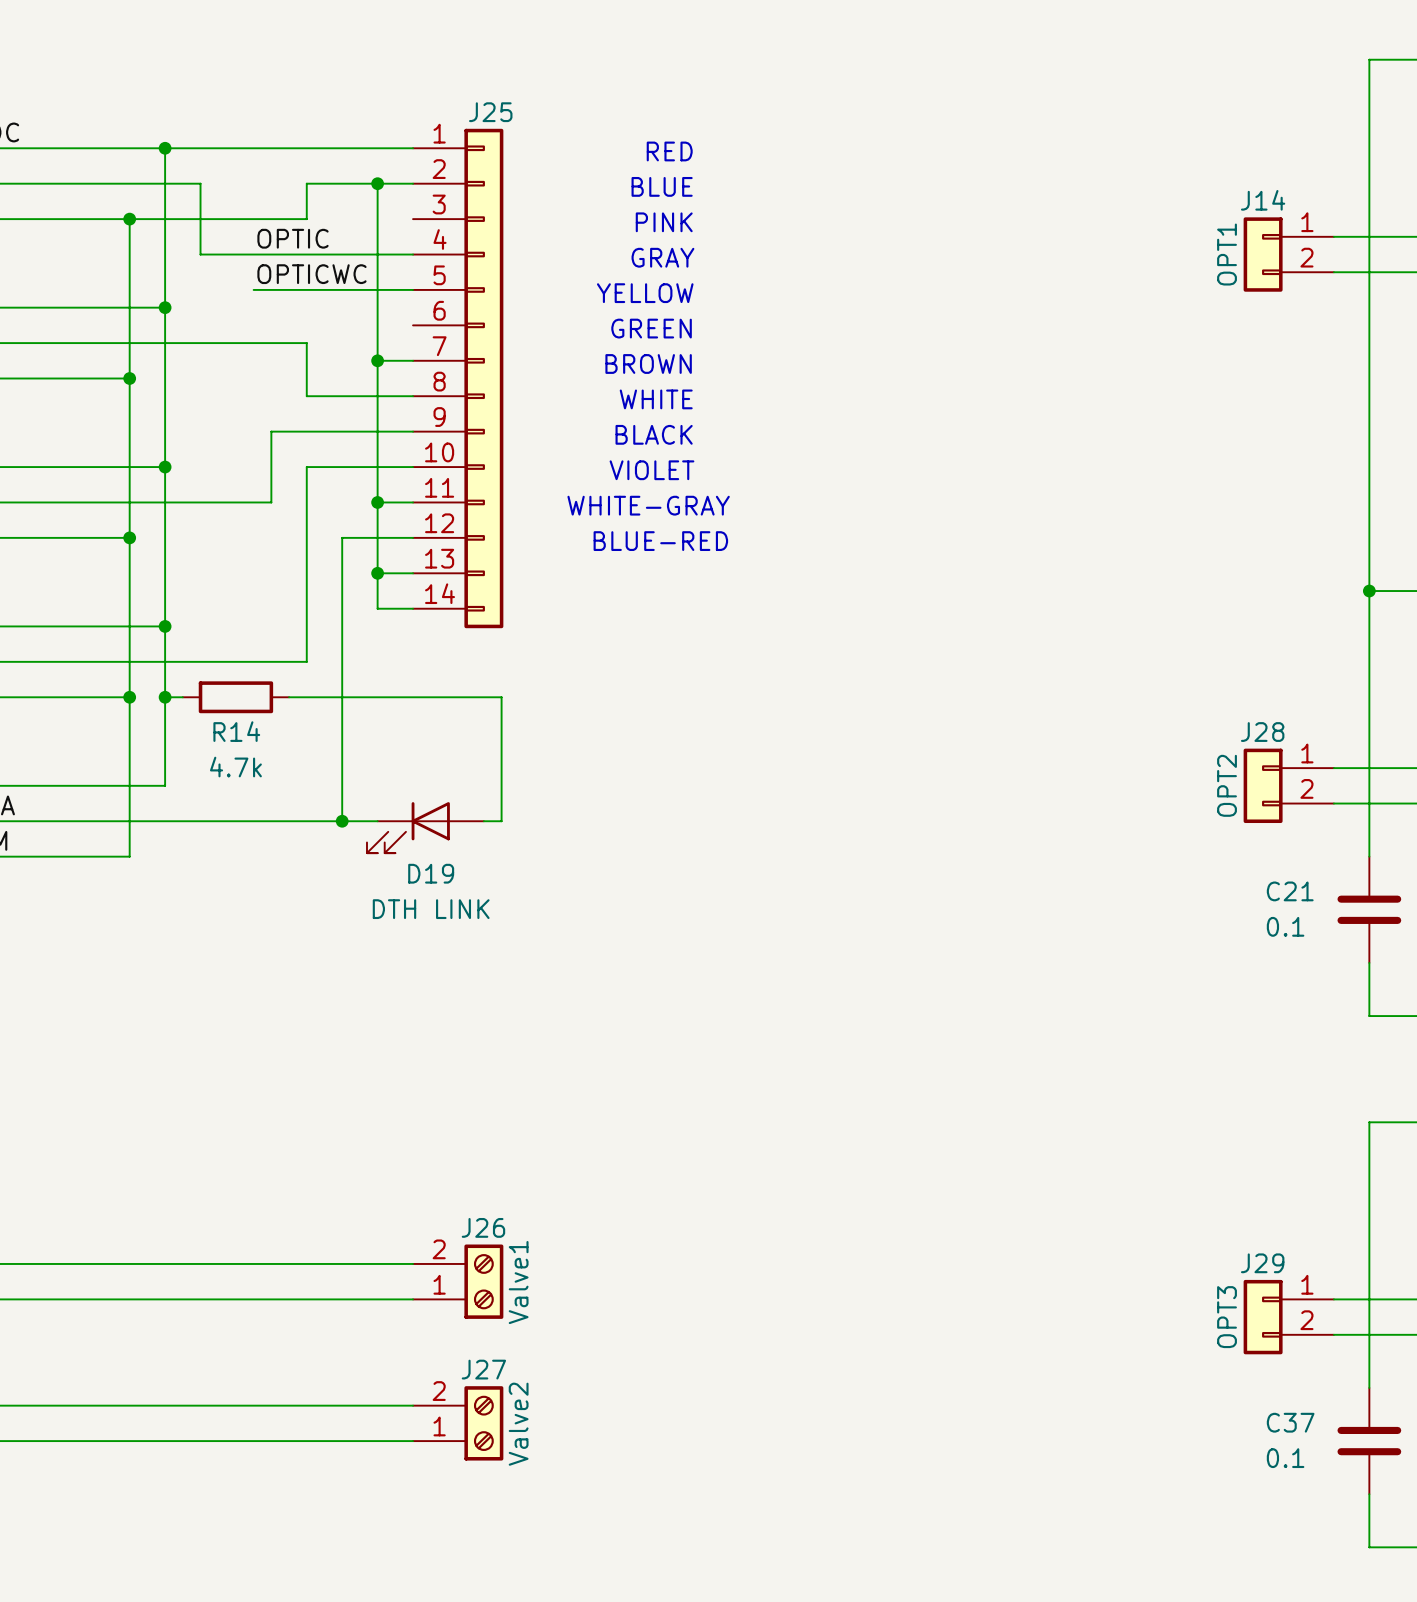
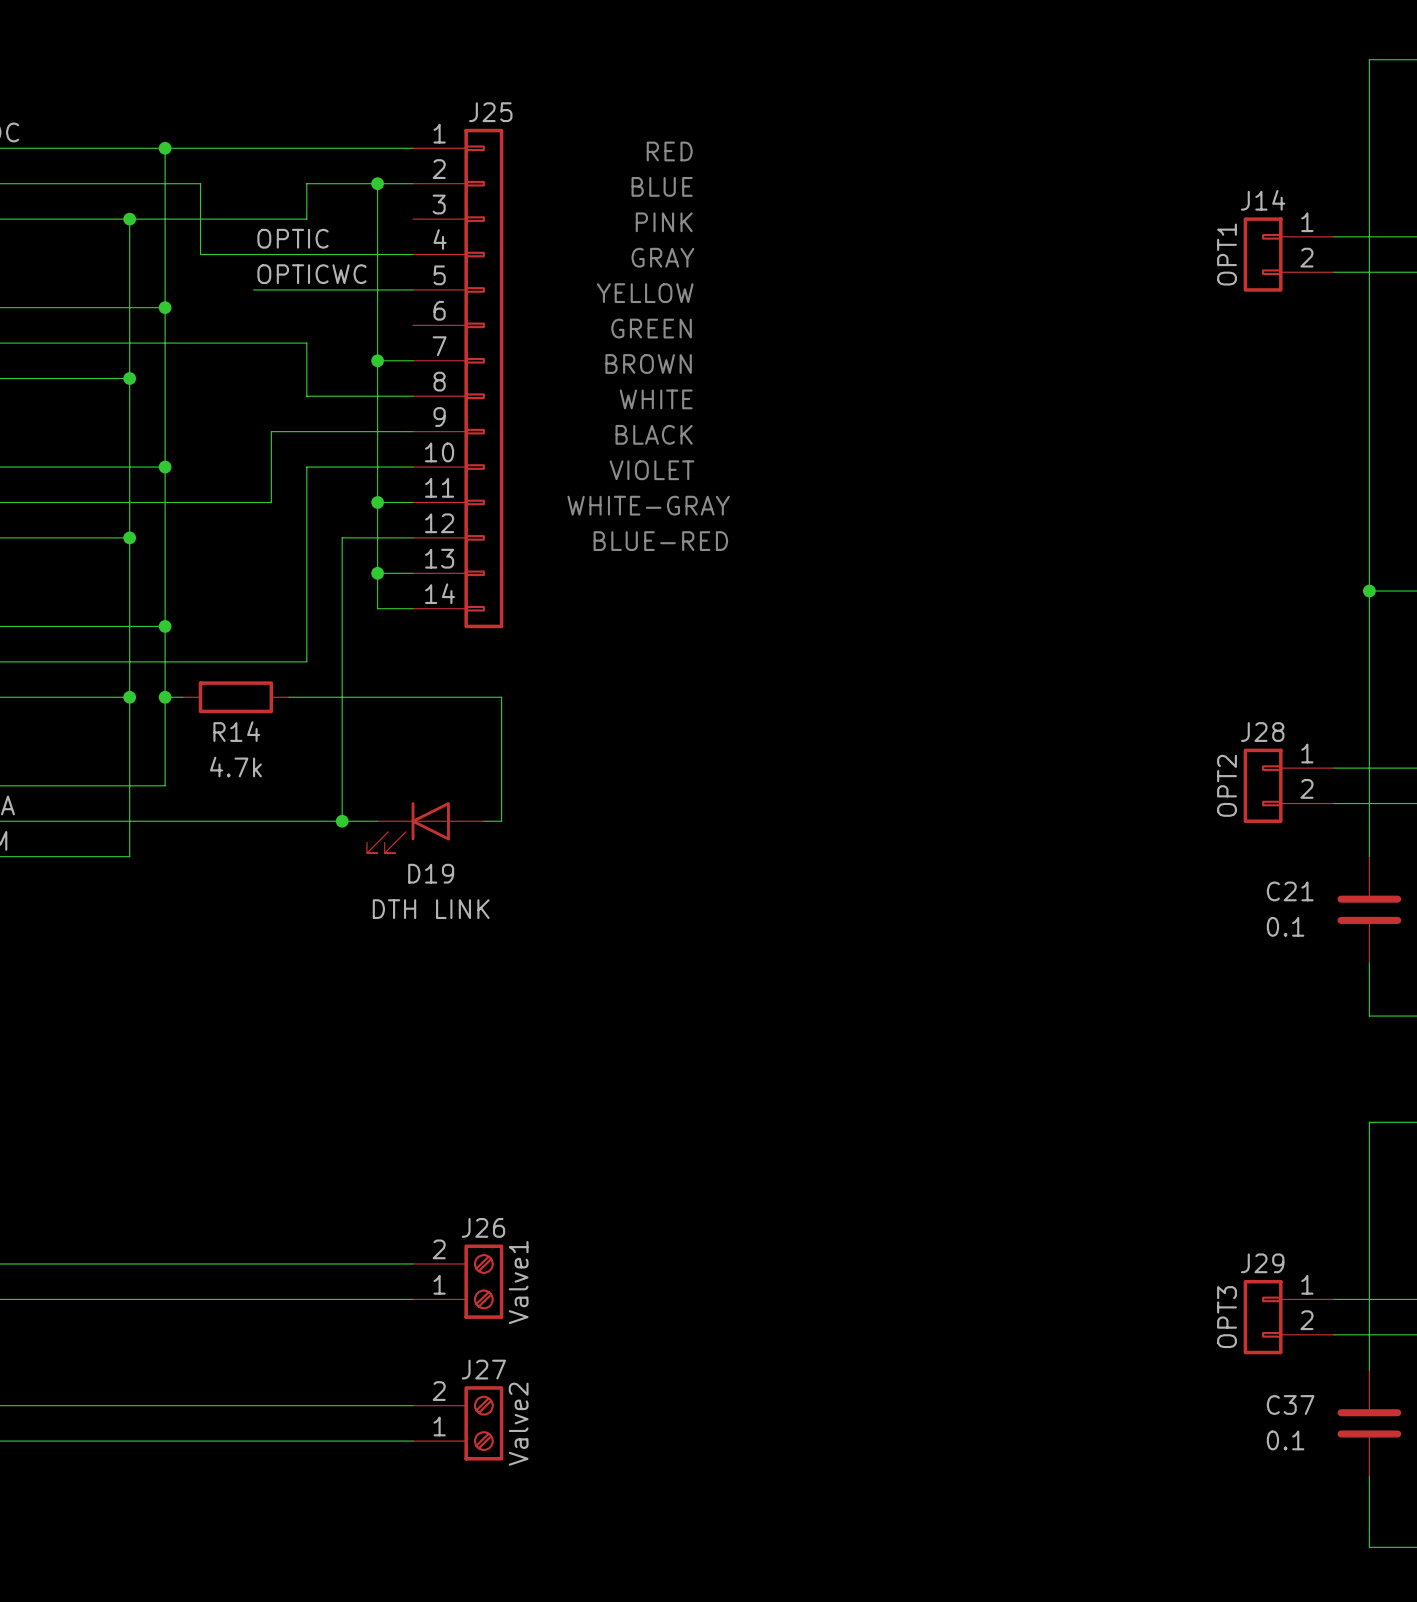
C37 position: (1369, 1441) -> (1369, 1423)

